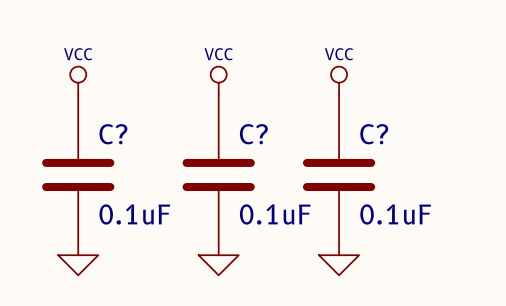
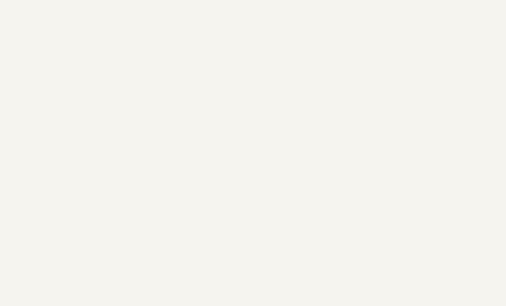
power symbol: VCC (78, 80) -> none
power symbol: VCC (218, 80) -> none
power symbol: VCC (339, 80) -> none
C?: 0.1uF (78, 174) -> none
C?: 0.1uF (218, 174) -> none
C?: 0.1uF (339, 174) -> none
power symbol: (78, 265) -> none
power symbol: (218, 265) -> none
power symbol: (339, 265) -> none

